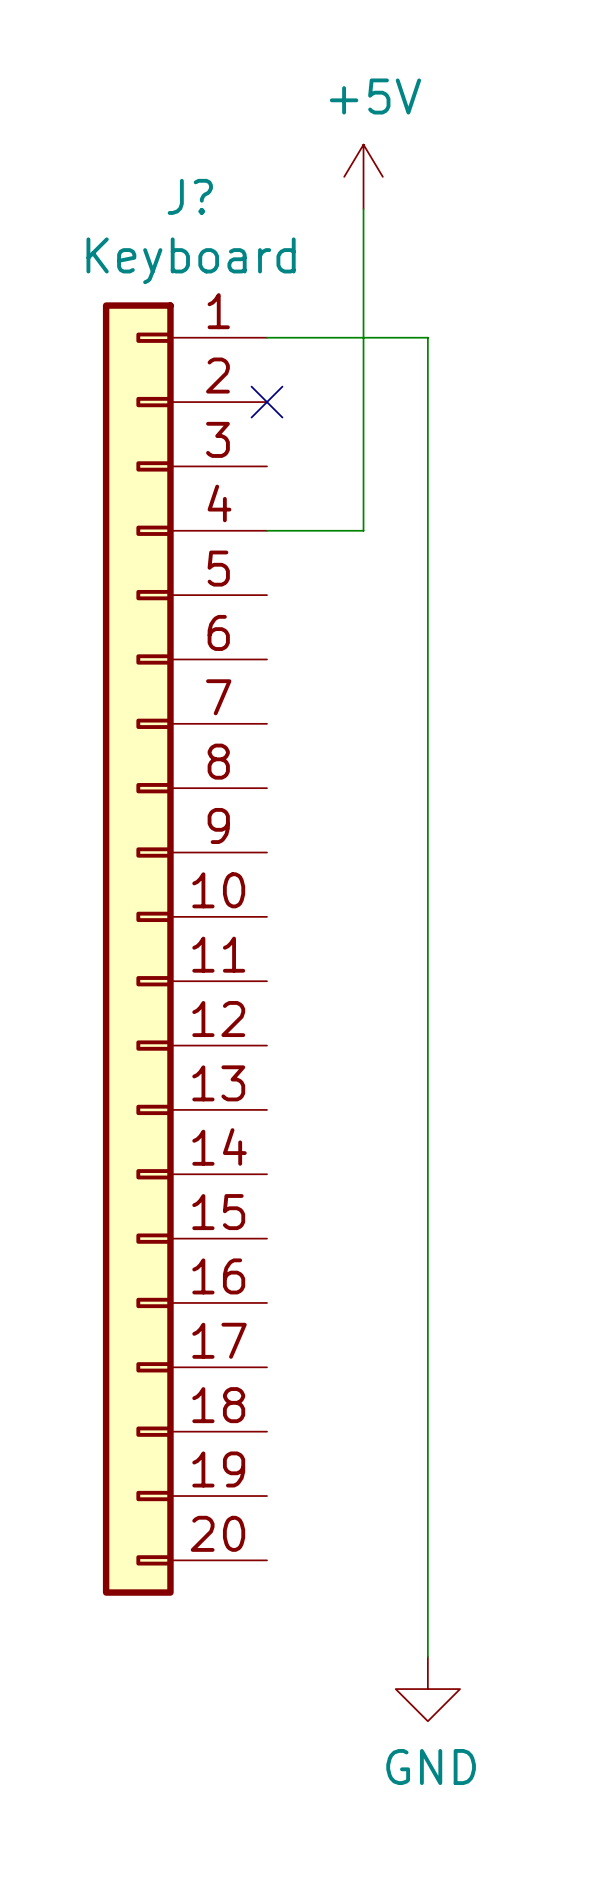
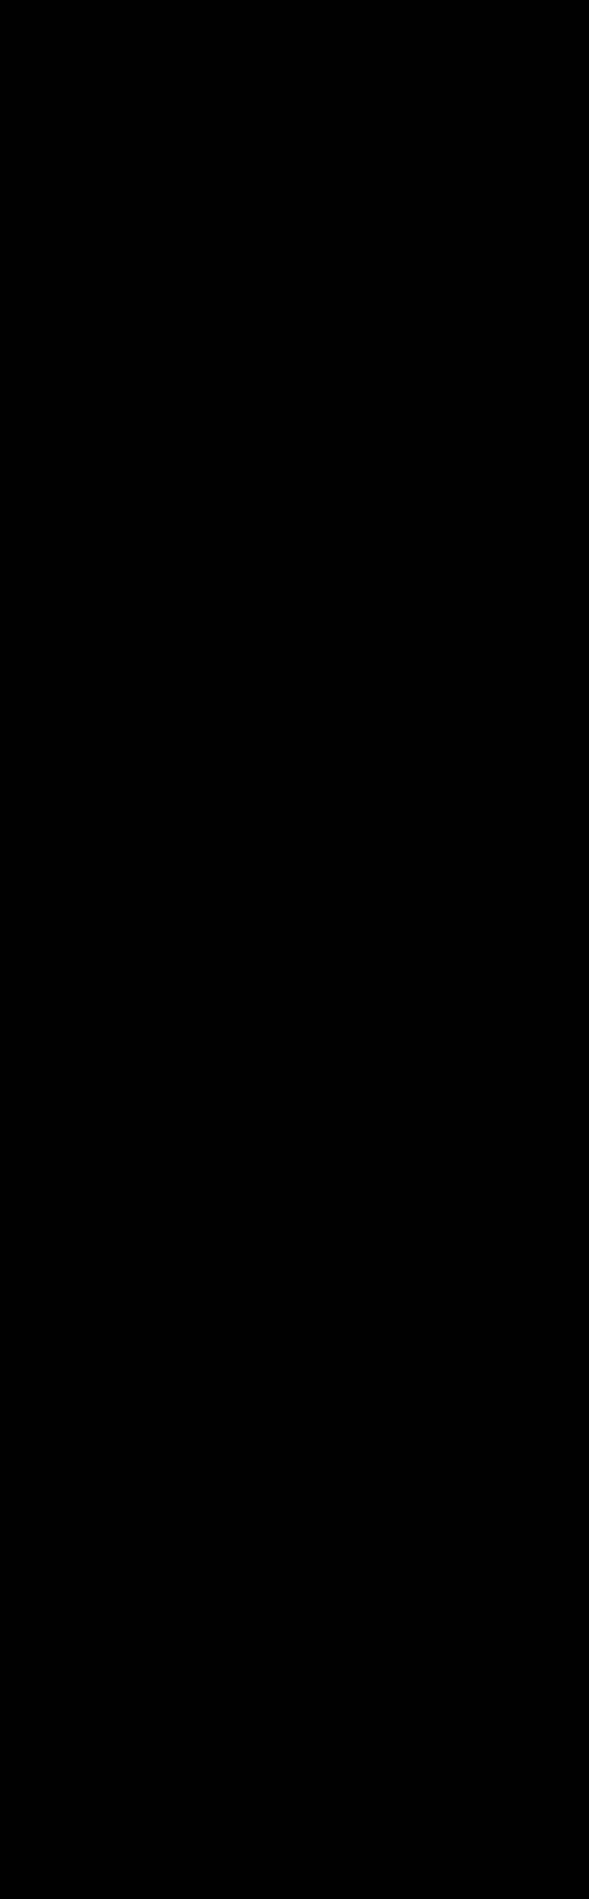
power symbol: +5V (363, 176) -> none
wire: (363, 209) (363, 530) (267, 530) -> none
wire: (267, 337) (427, 337) (427, 1656) -> none
no-connect mark: (267, 402) -> none
J?: Keyboard (184, 949) -> none
power symbol: GND (427, 1689) -> none

